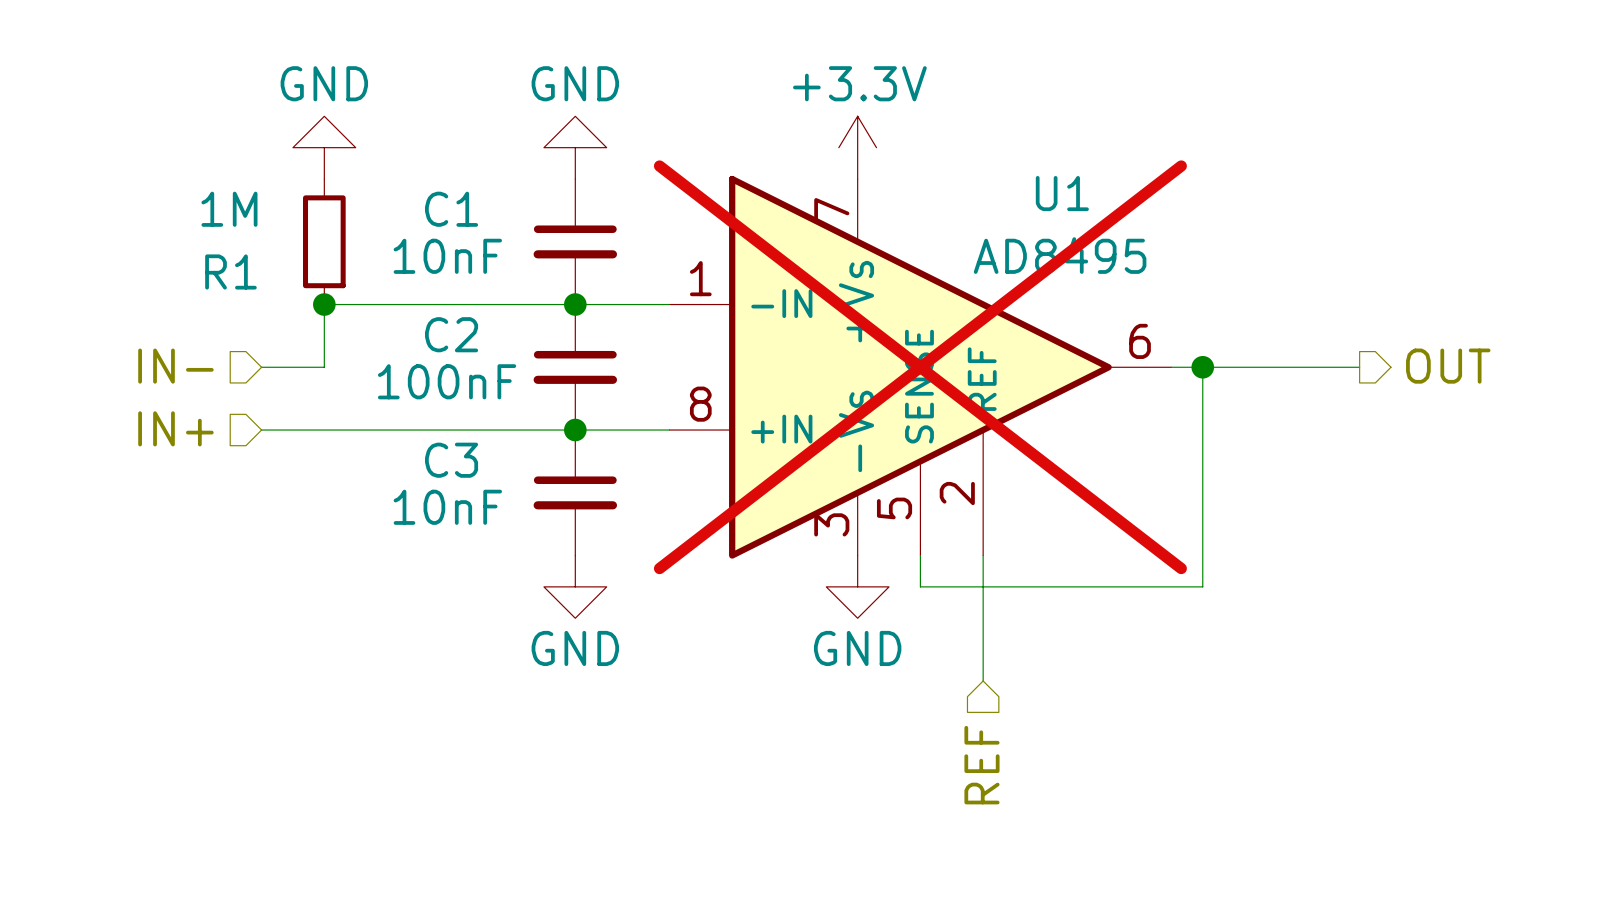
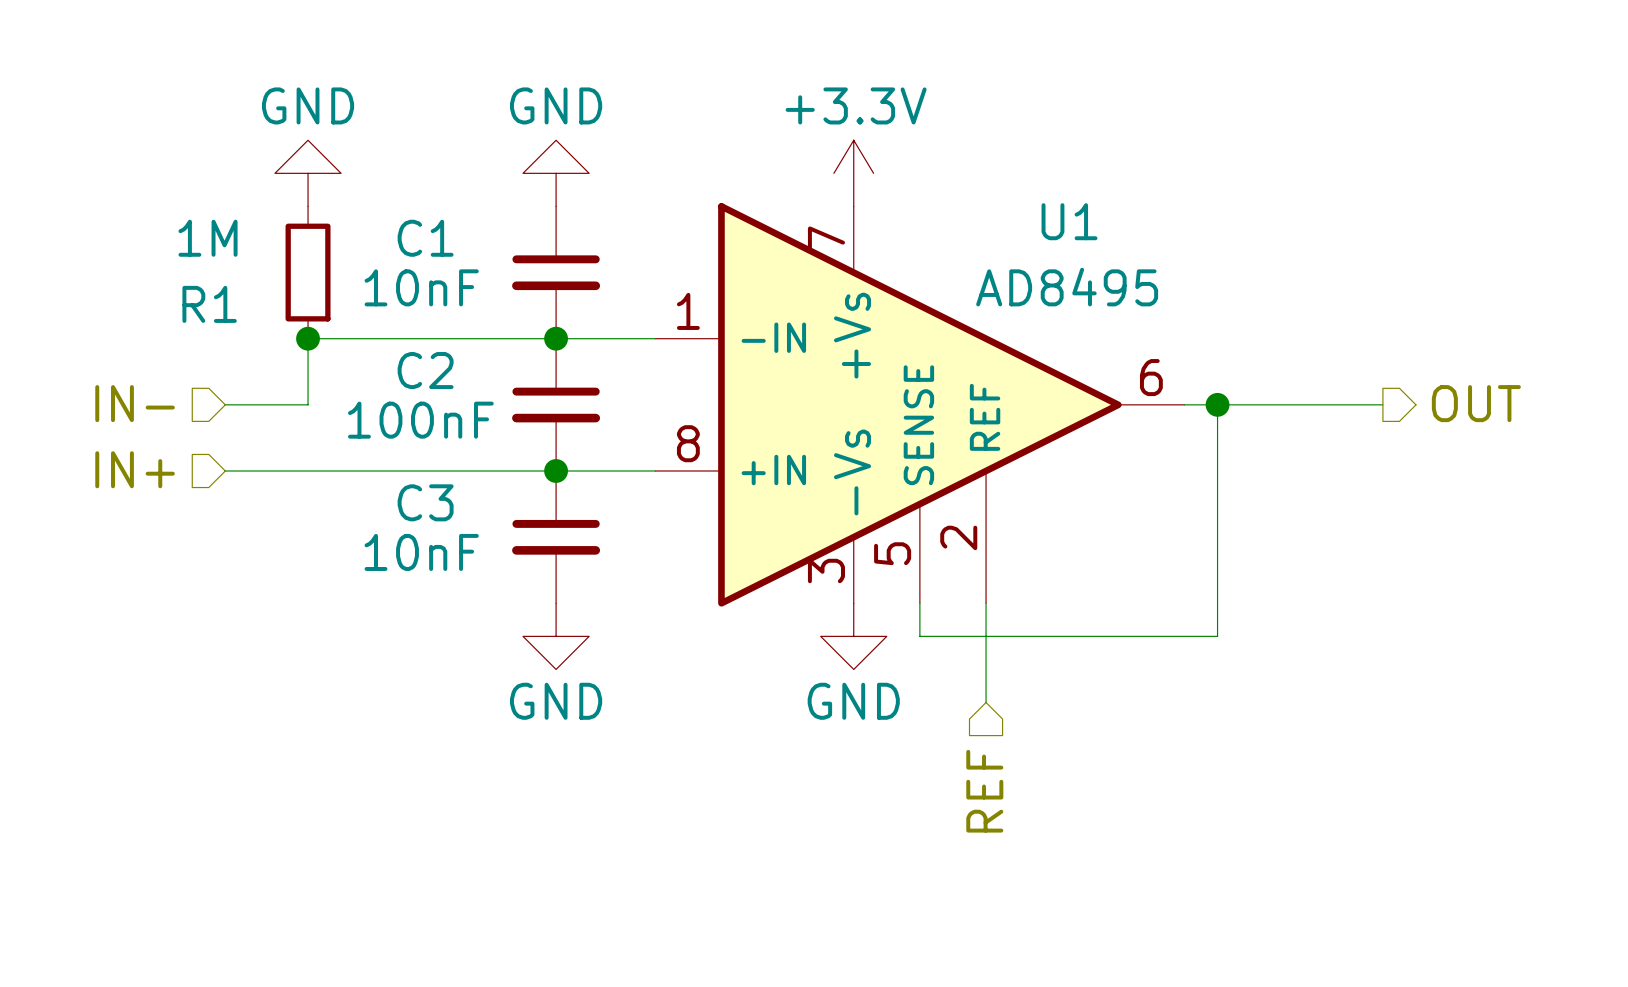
power symbol position: GND (324, 147) -> GND (308, 173)
R1 position: (324, 241) -> (308, 272)
junction position: (324, 304) -> (308, 338)
wire: (340, 304) (324, 304) (324, 367) -> (308, 338) (308, 404) (291, 404)
U1 do-not-place cross: (920, 367) -> none
wire: (983, 649) (983, 681) -> none
hierarchical label position: REF (981, 765) -> REF (984, 791)

